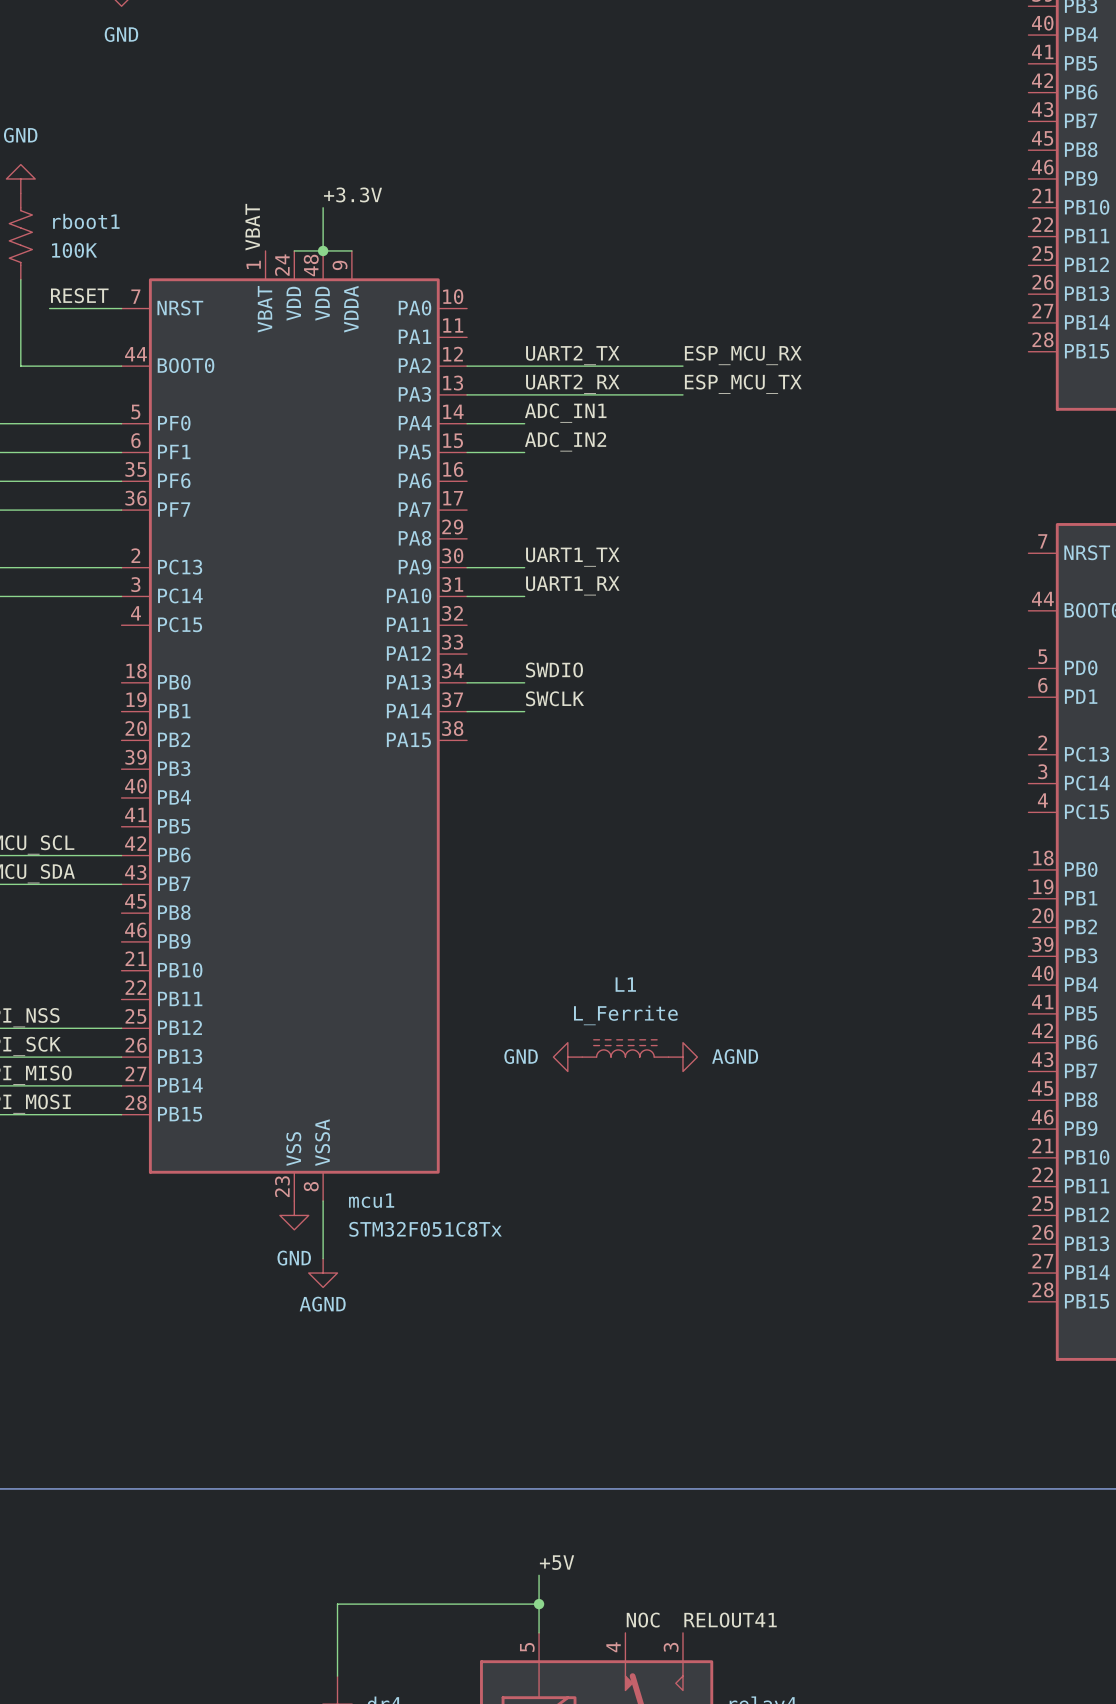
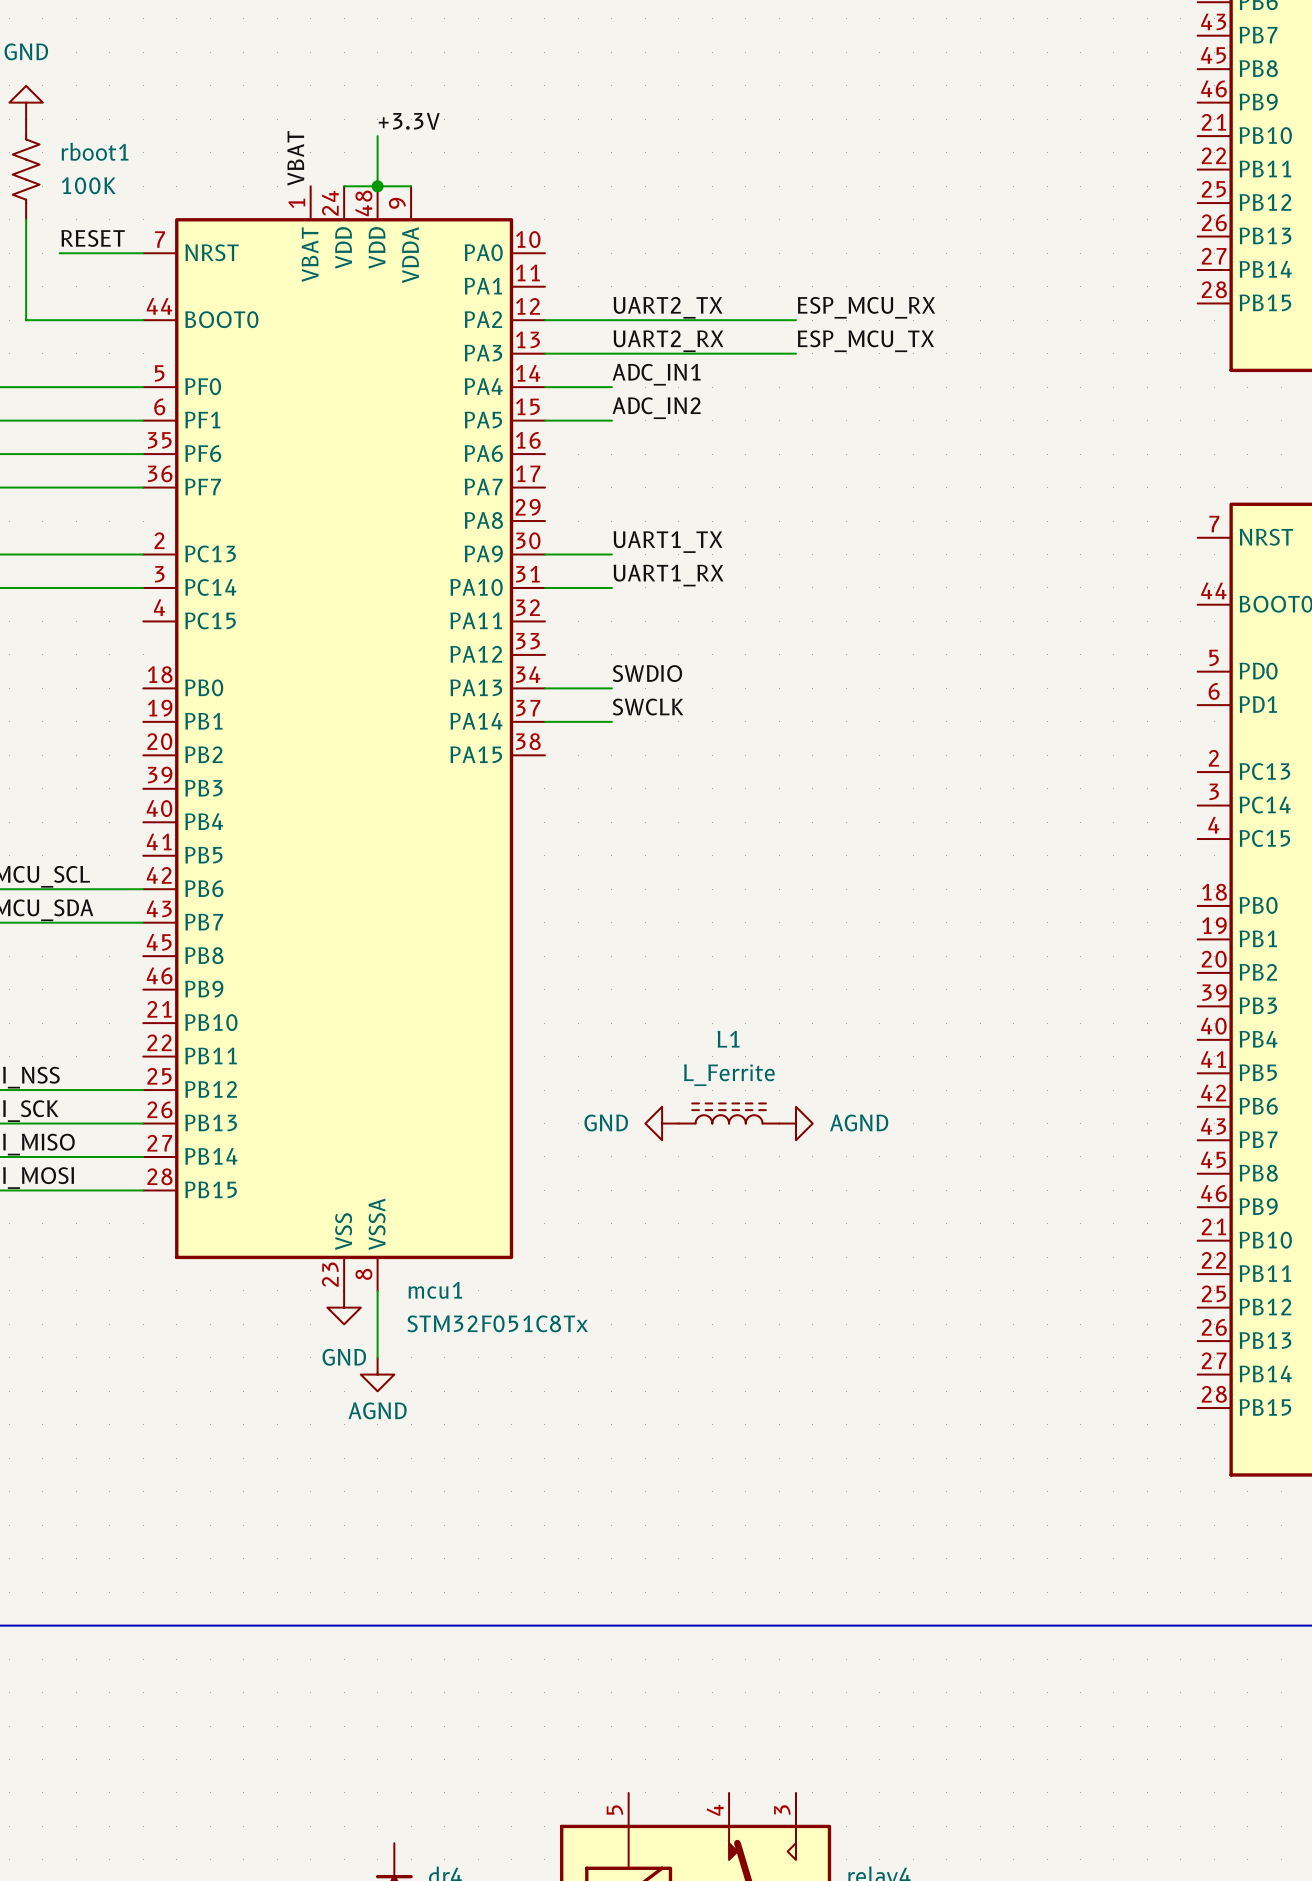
label: +5V (557, 1562) -> none
wire: (539, 1575) (539, 1632) -> none
wire: (539, 1604) (337, 1604) (337, 1676) -> none
junction: (539, 1604) -> none
label: NOC (643, 1620) -> none
label: RELOUT41 (730, 1620) -> none

